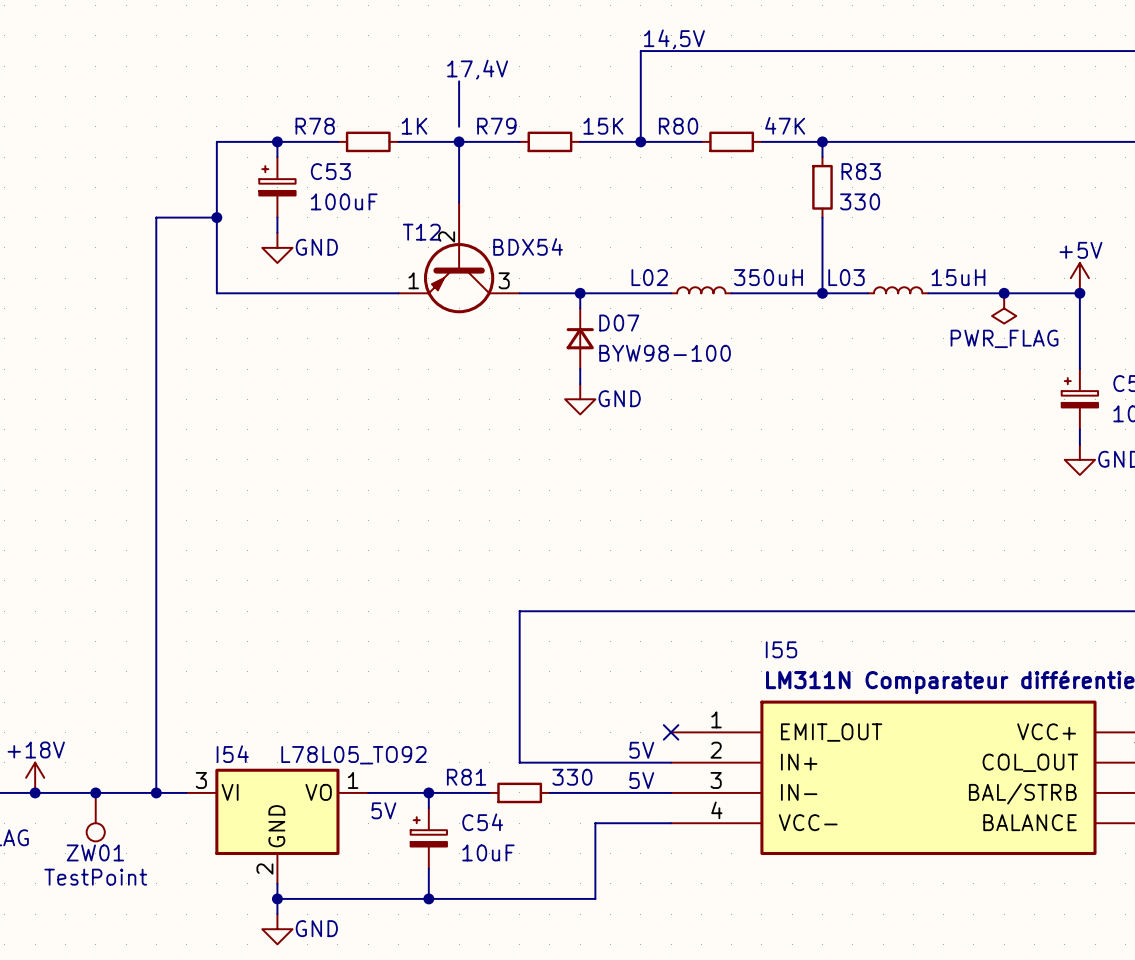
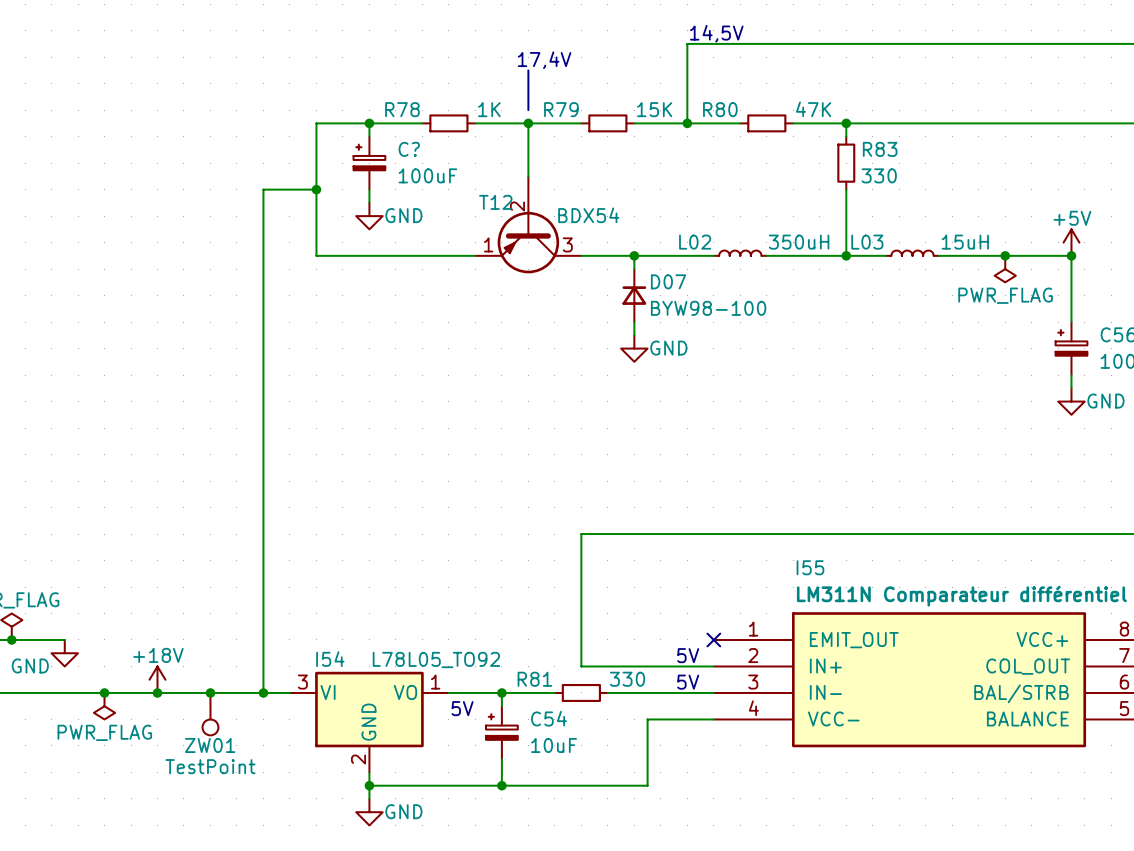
C53 name: C53 (330, 171) -> C? (409, 149)

